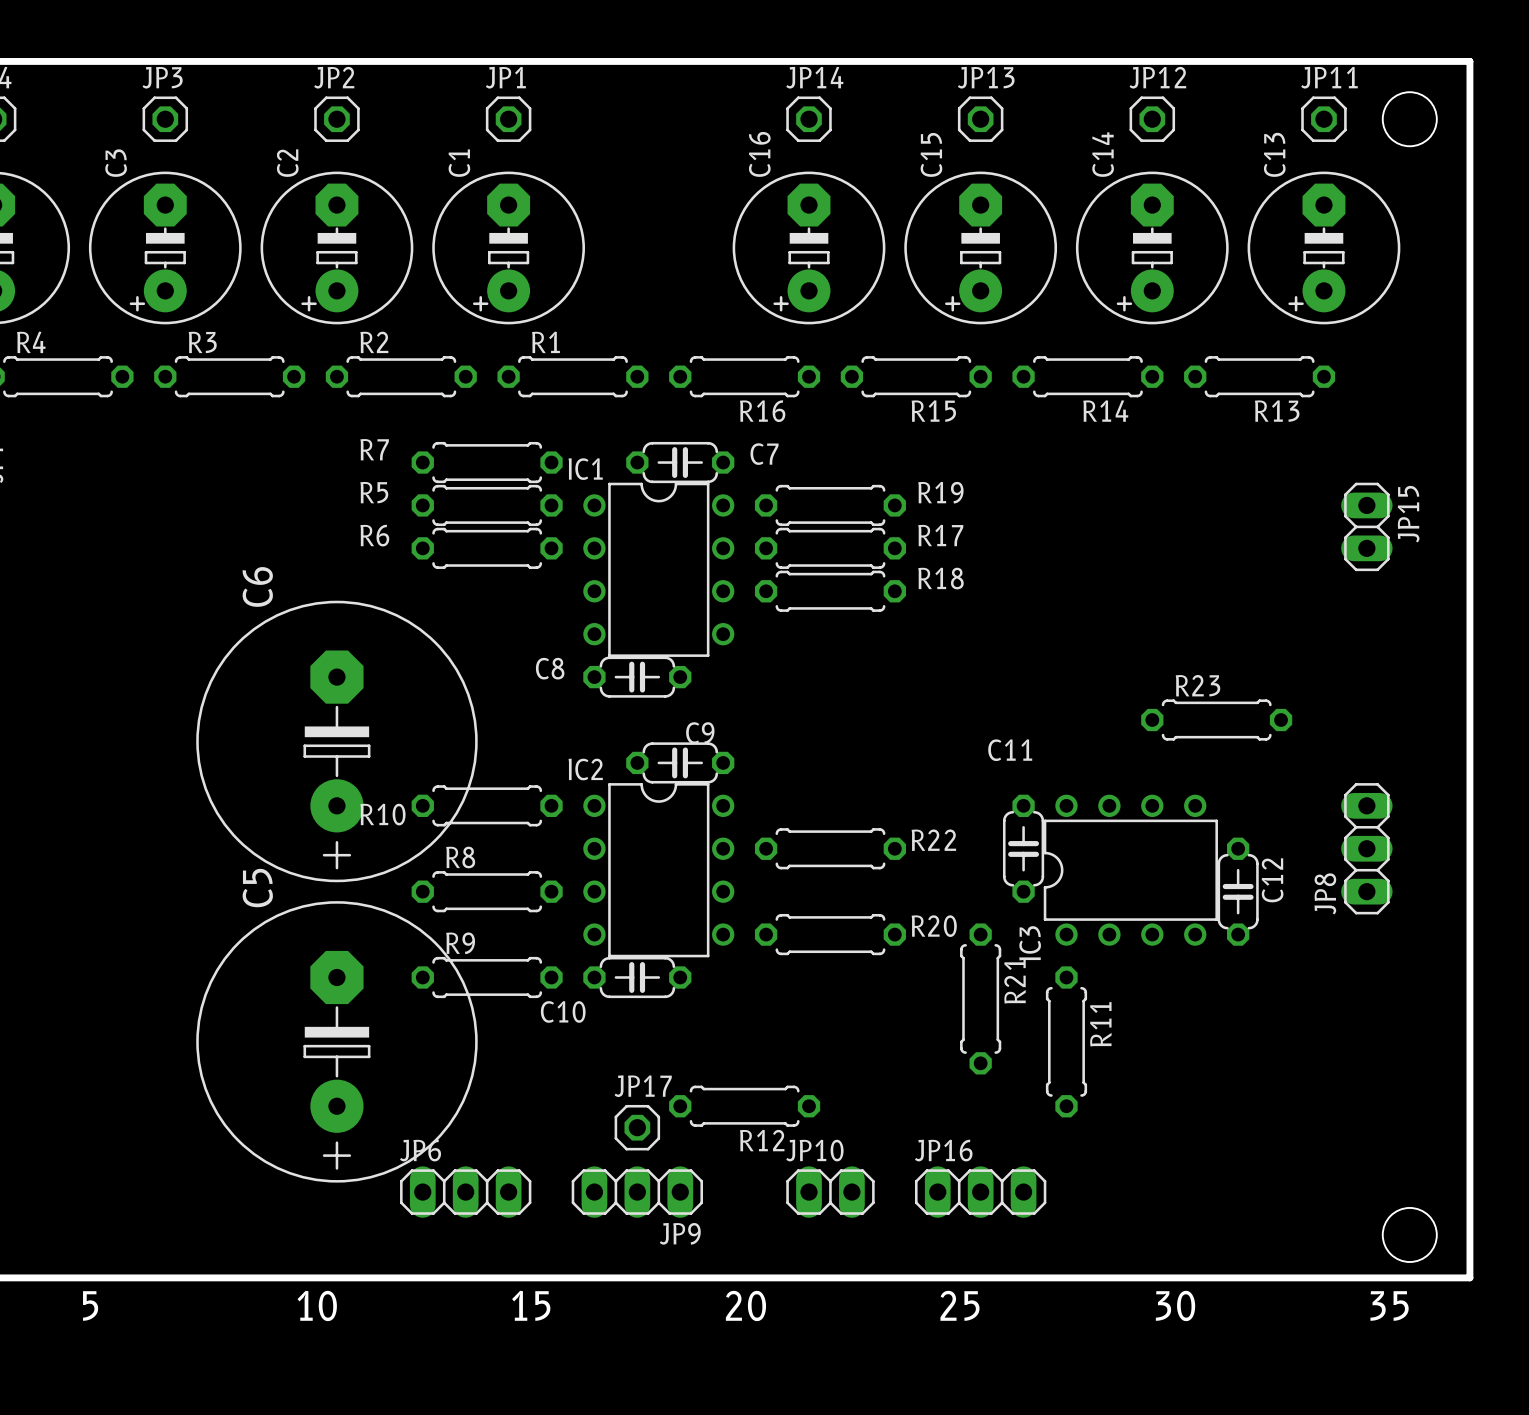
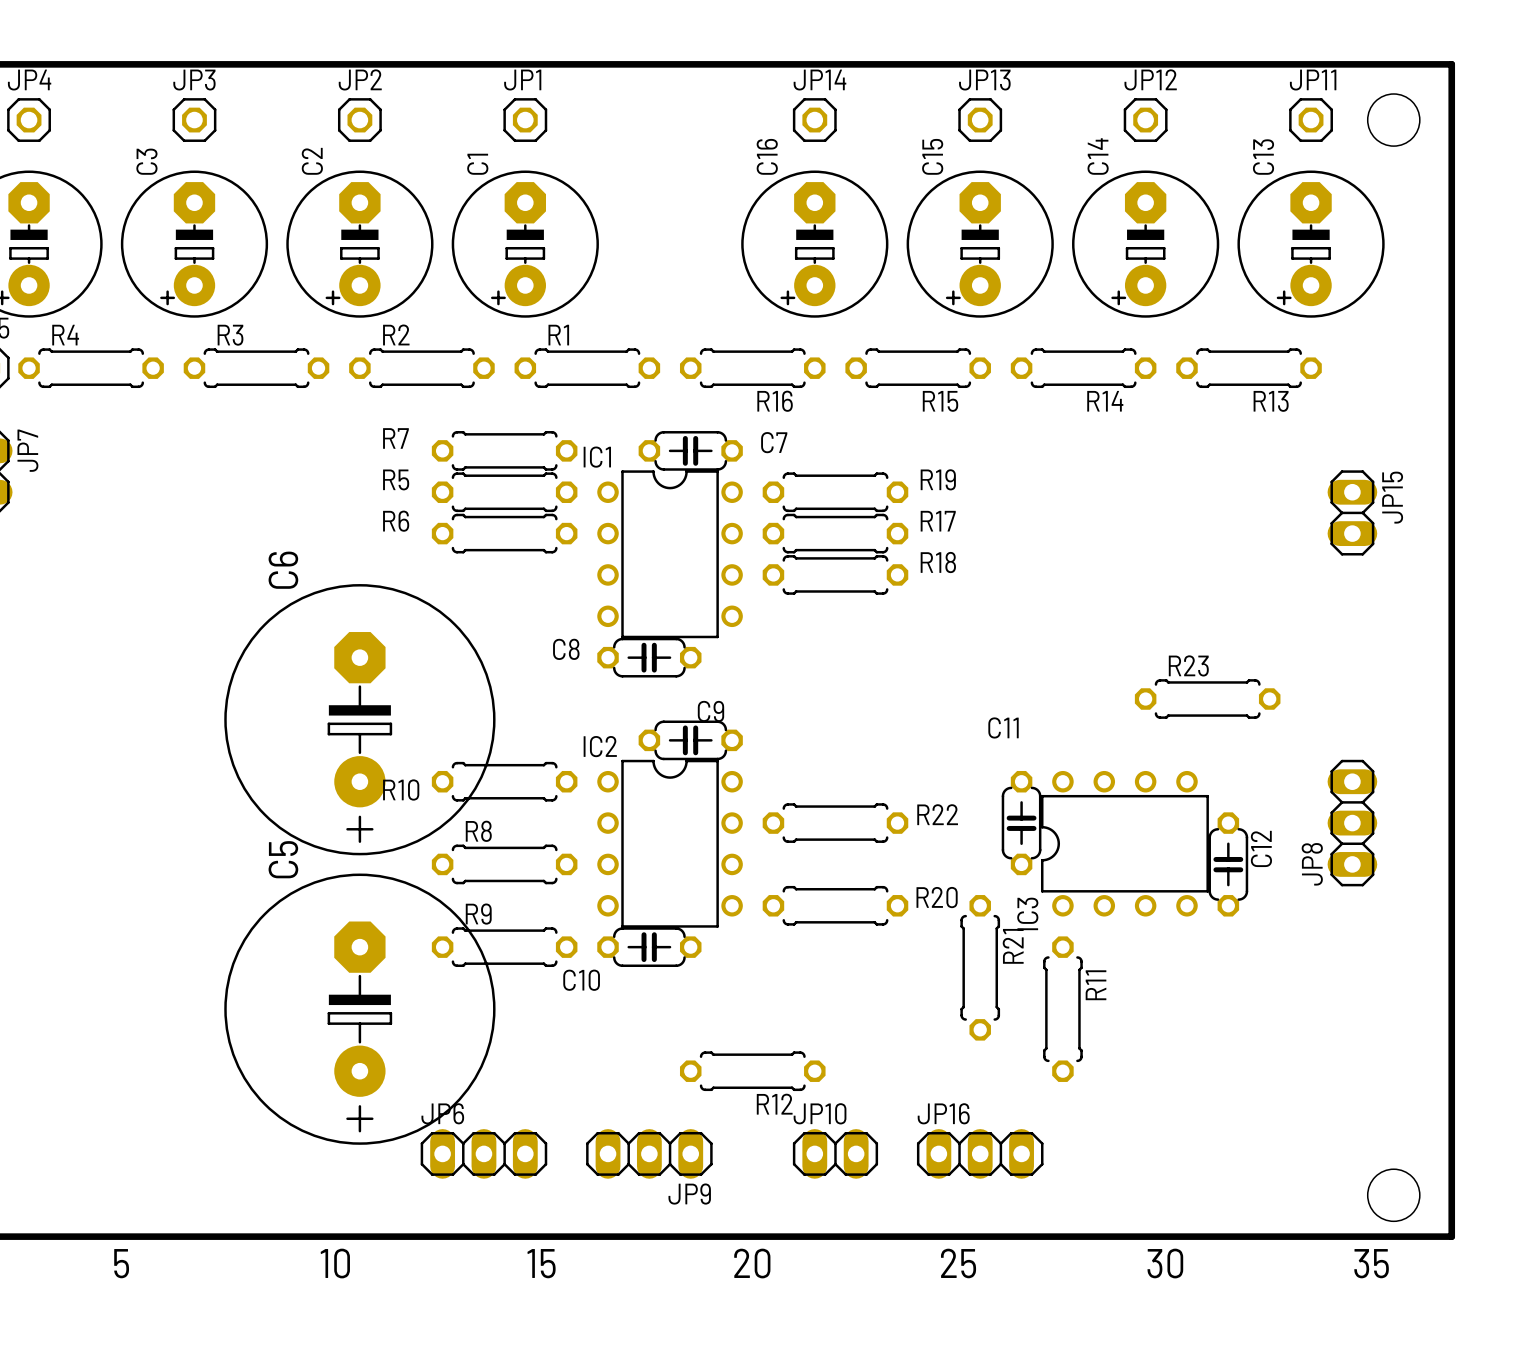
JP17: (637, 1127) -> none

